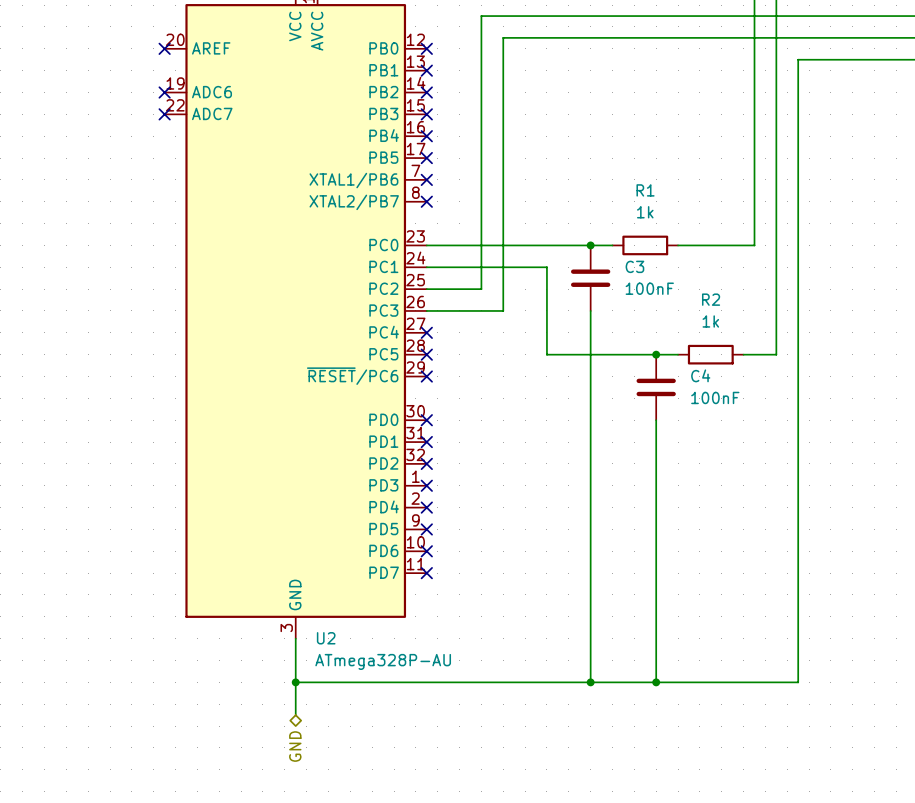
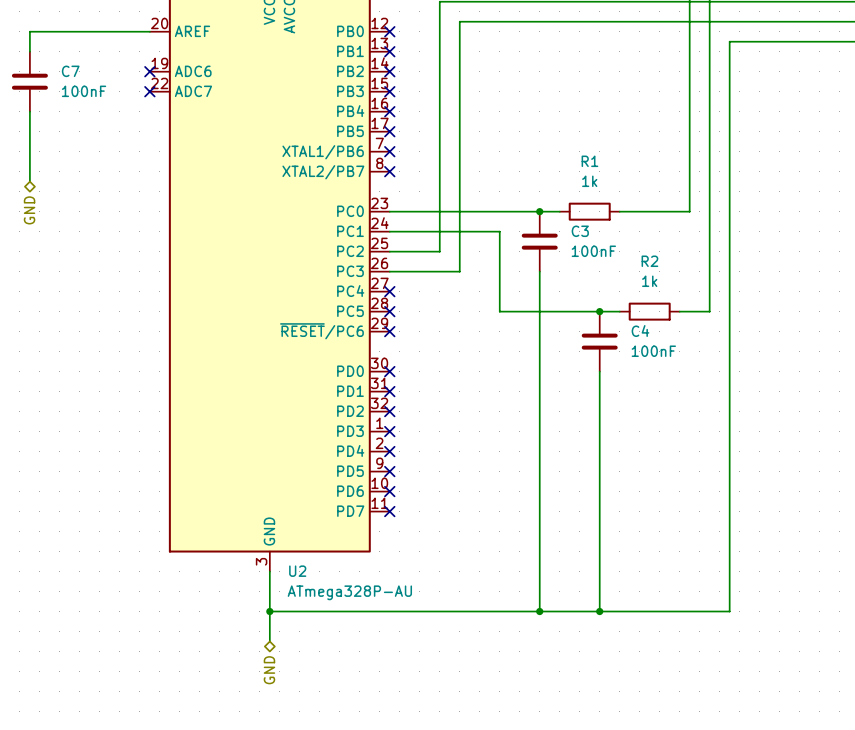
wire: none -> (149, 31) (29, 31) (29, 51)
no-connect mark: (164, 48) -> none
C7: none -> 100nF (29, 81)
wire: none -> (29, 111) (29, 181)
hierarchical label: none -> GND (29, 210)

